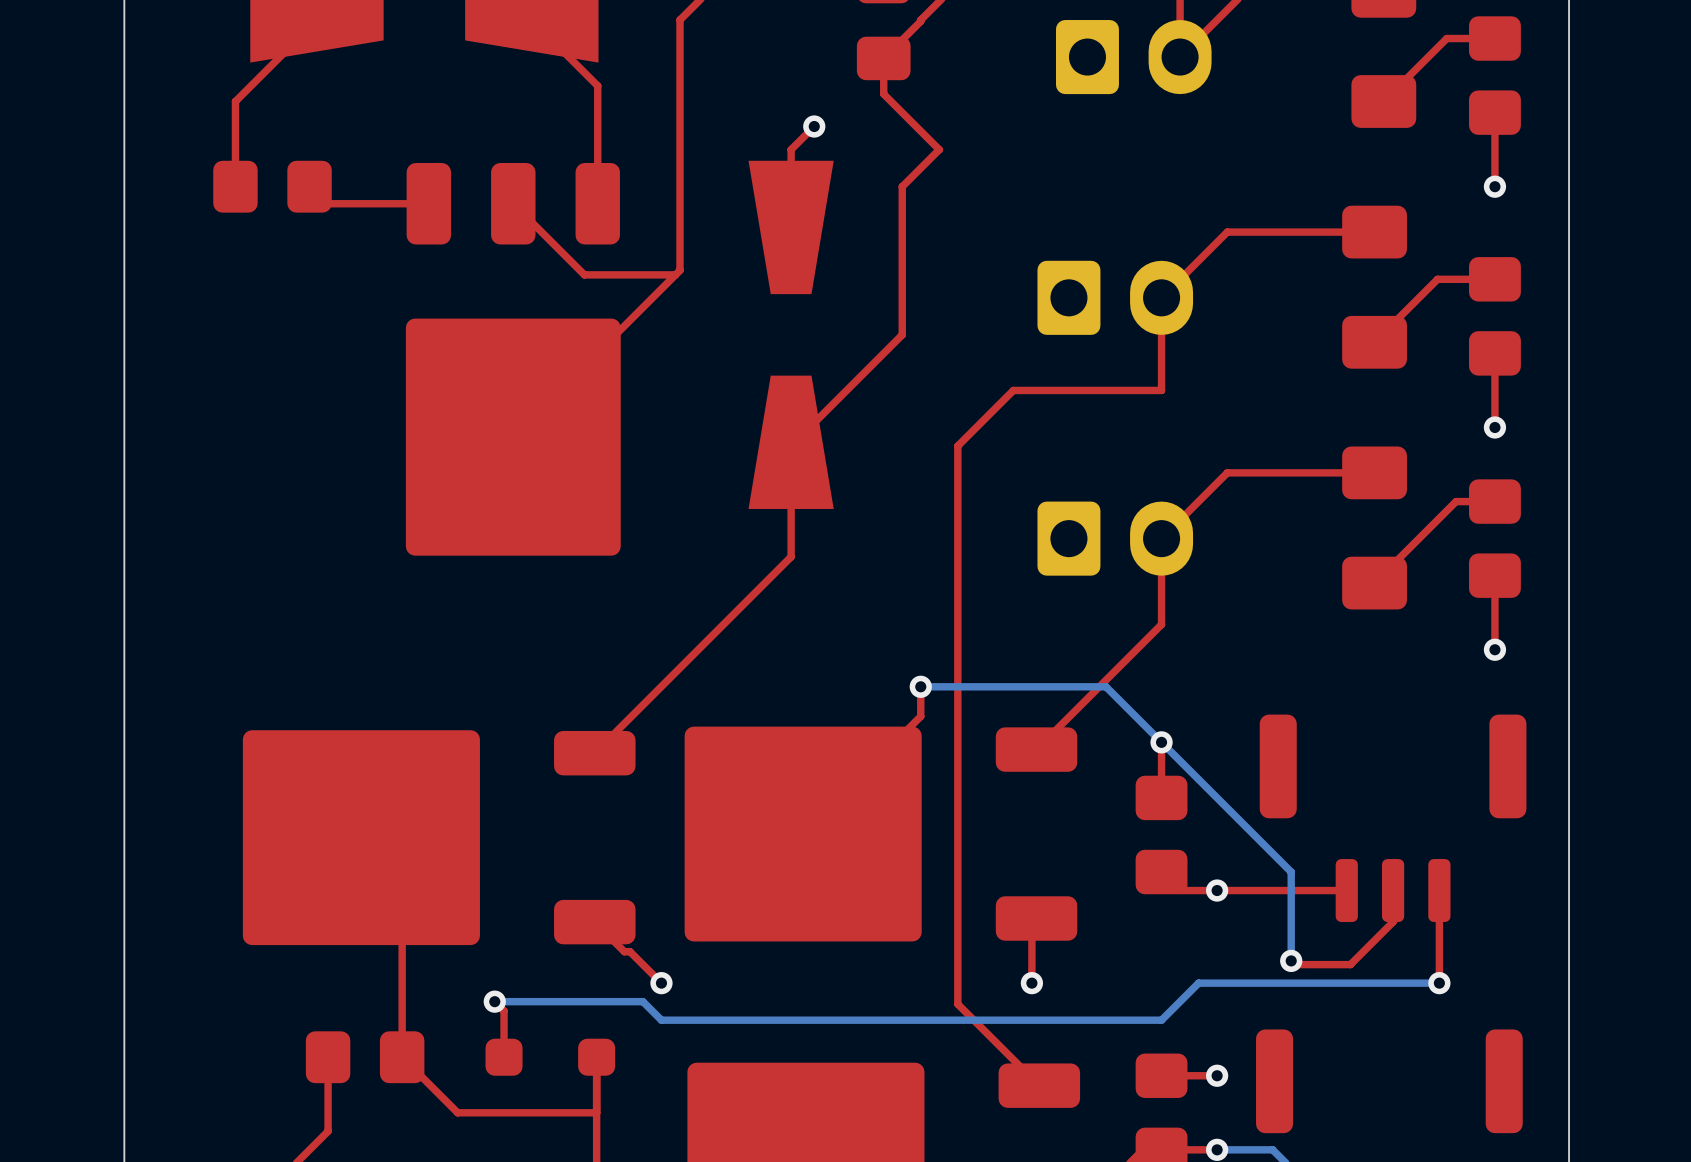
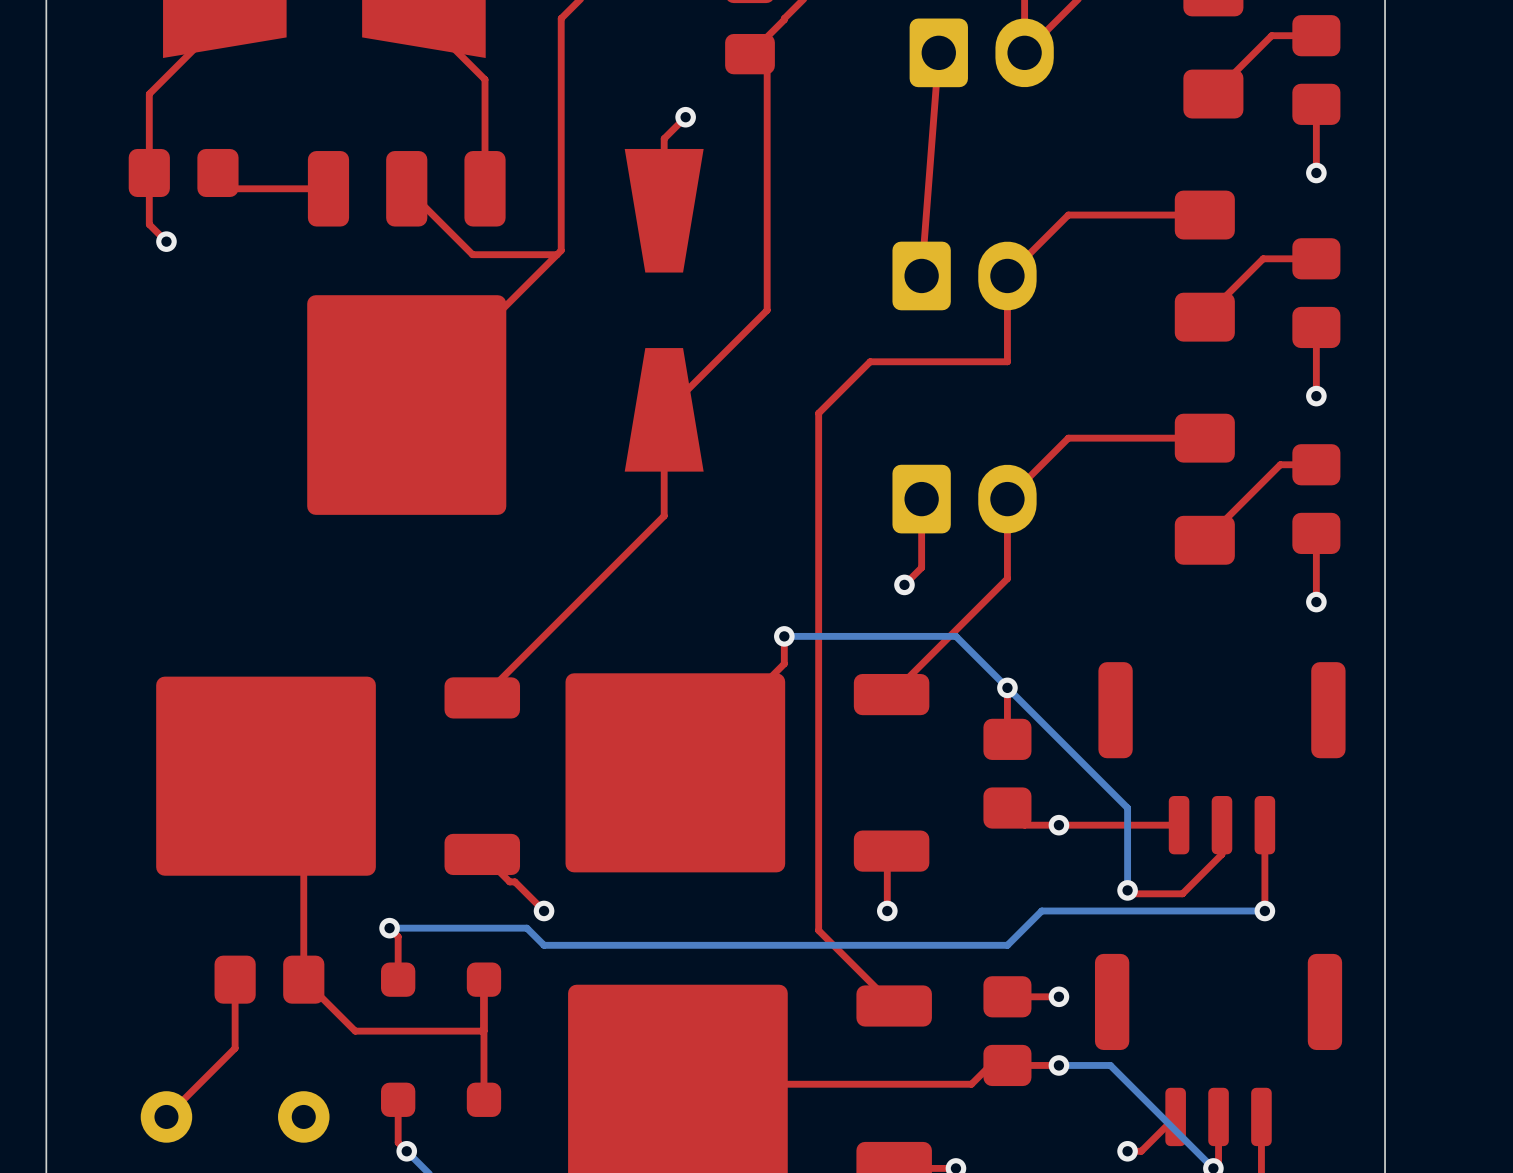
top track: none -> (938, 52) (921, 275)
top track: (883, 58) (883, 94) (939, 149) (902, 186) -> (750, 54) (767, 71) (767, 172)
top track: none -> (149, 172) (149, 224) (166, 241)
via: none -> (166, 241)
top track: none -> (921, 499) (921, 567) (904, 584)
via: none -> (904, 584)

